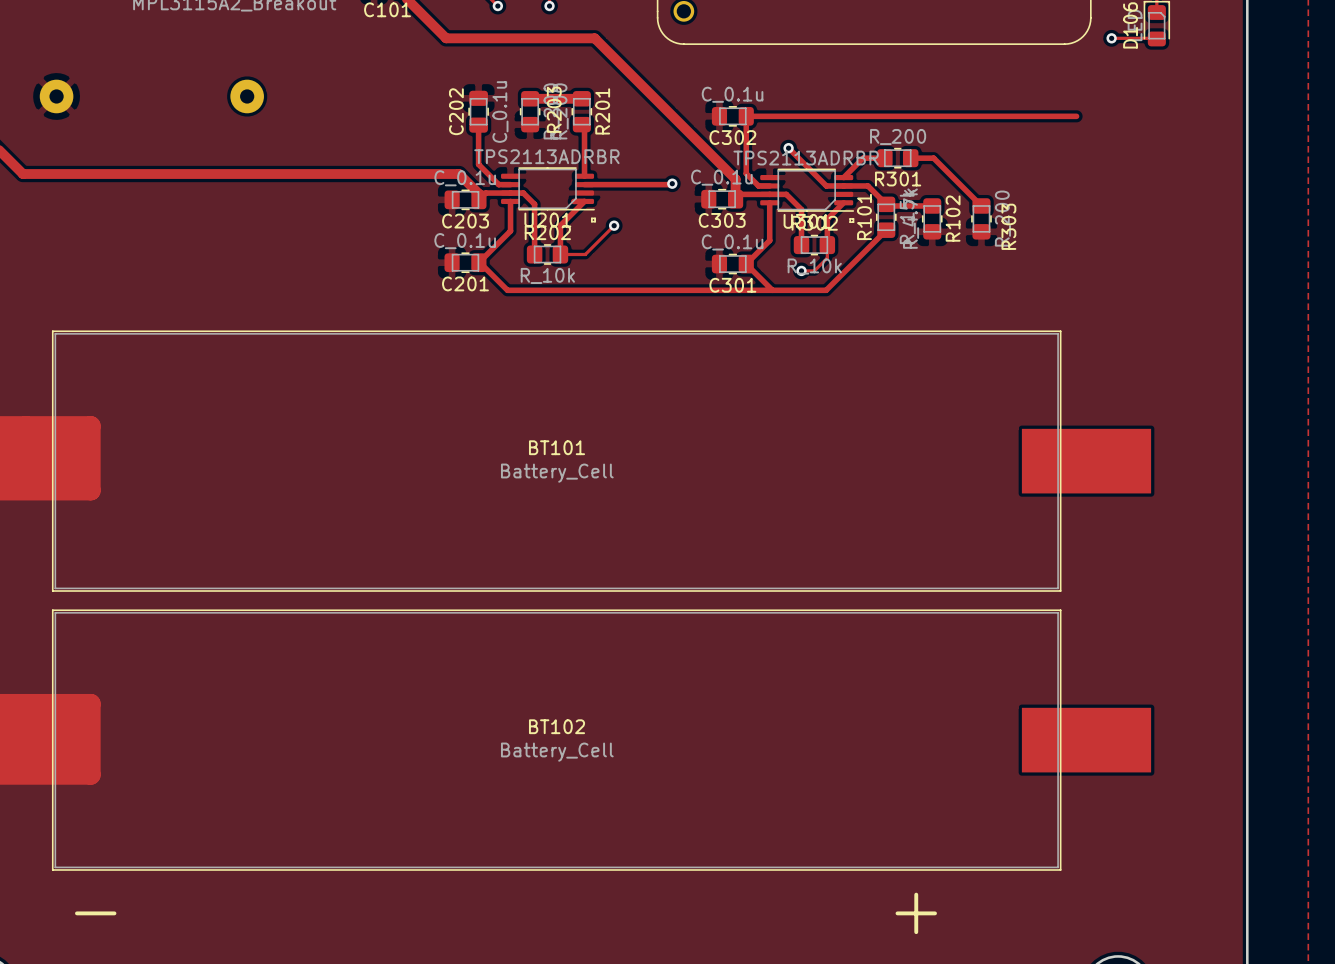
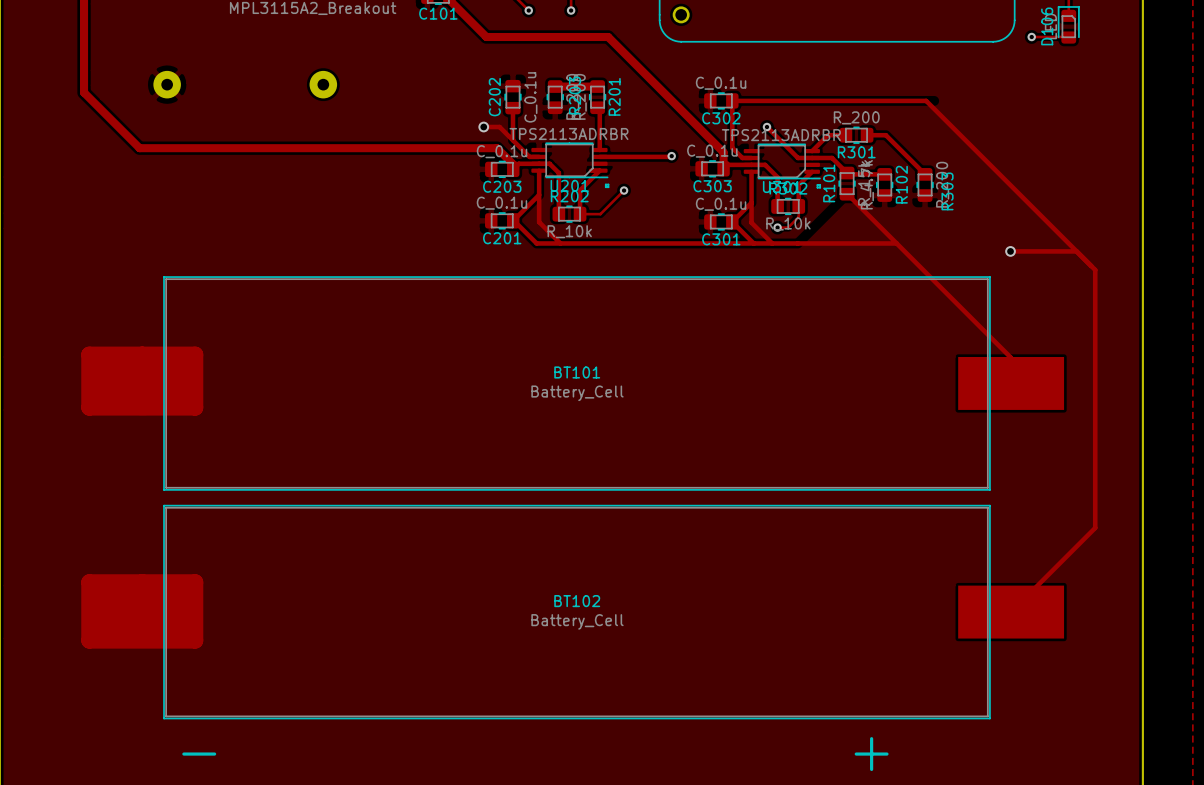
track: (982, 116) (1076, 116) -> (926, 100) (1095, 269) (1095, 527) (1011, 612)
track: none -> (483, 127) (499, 127) (512, 140)
via: none -> (483, 127)
track: (886, 230) (826, 290) -> (896, 243) (797, 243)
track: none -> (847, 194) (1011, 357) (1011, 383)
track: none -> (539, 194) (539, 222) (560, 243)
track: none -> (751, 202) (751, 222) (772, 243)
track: none -> (1010, 251) (1076, 251)
via: none -> (1010, 251)

